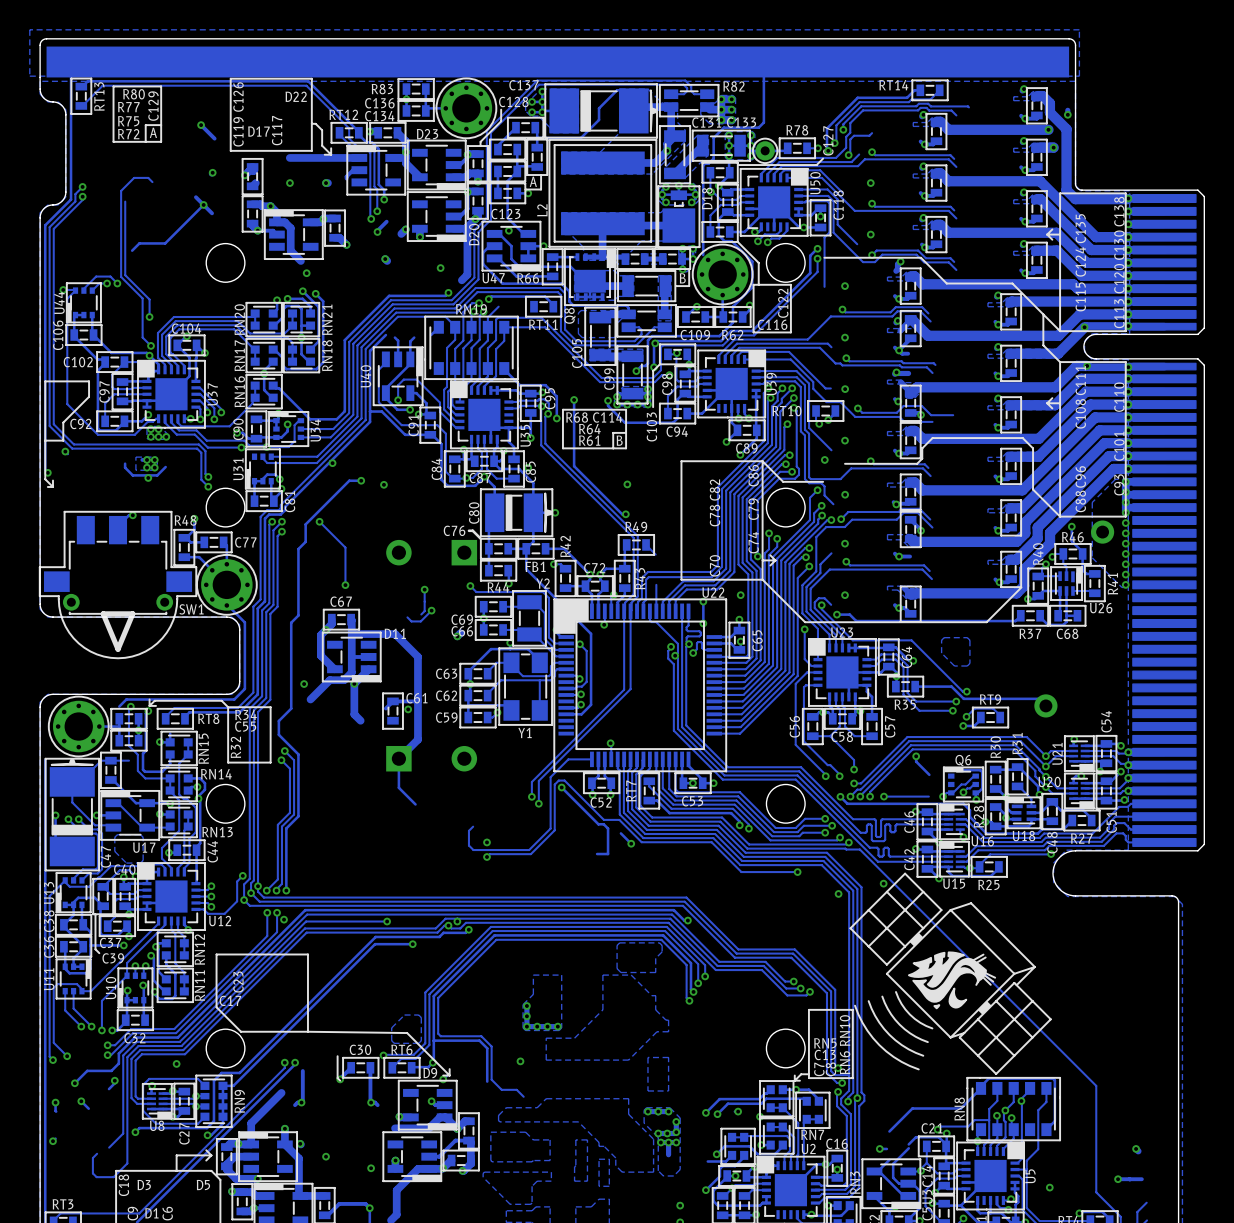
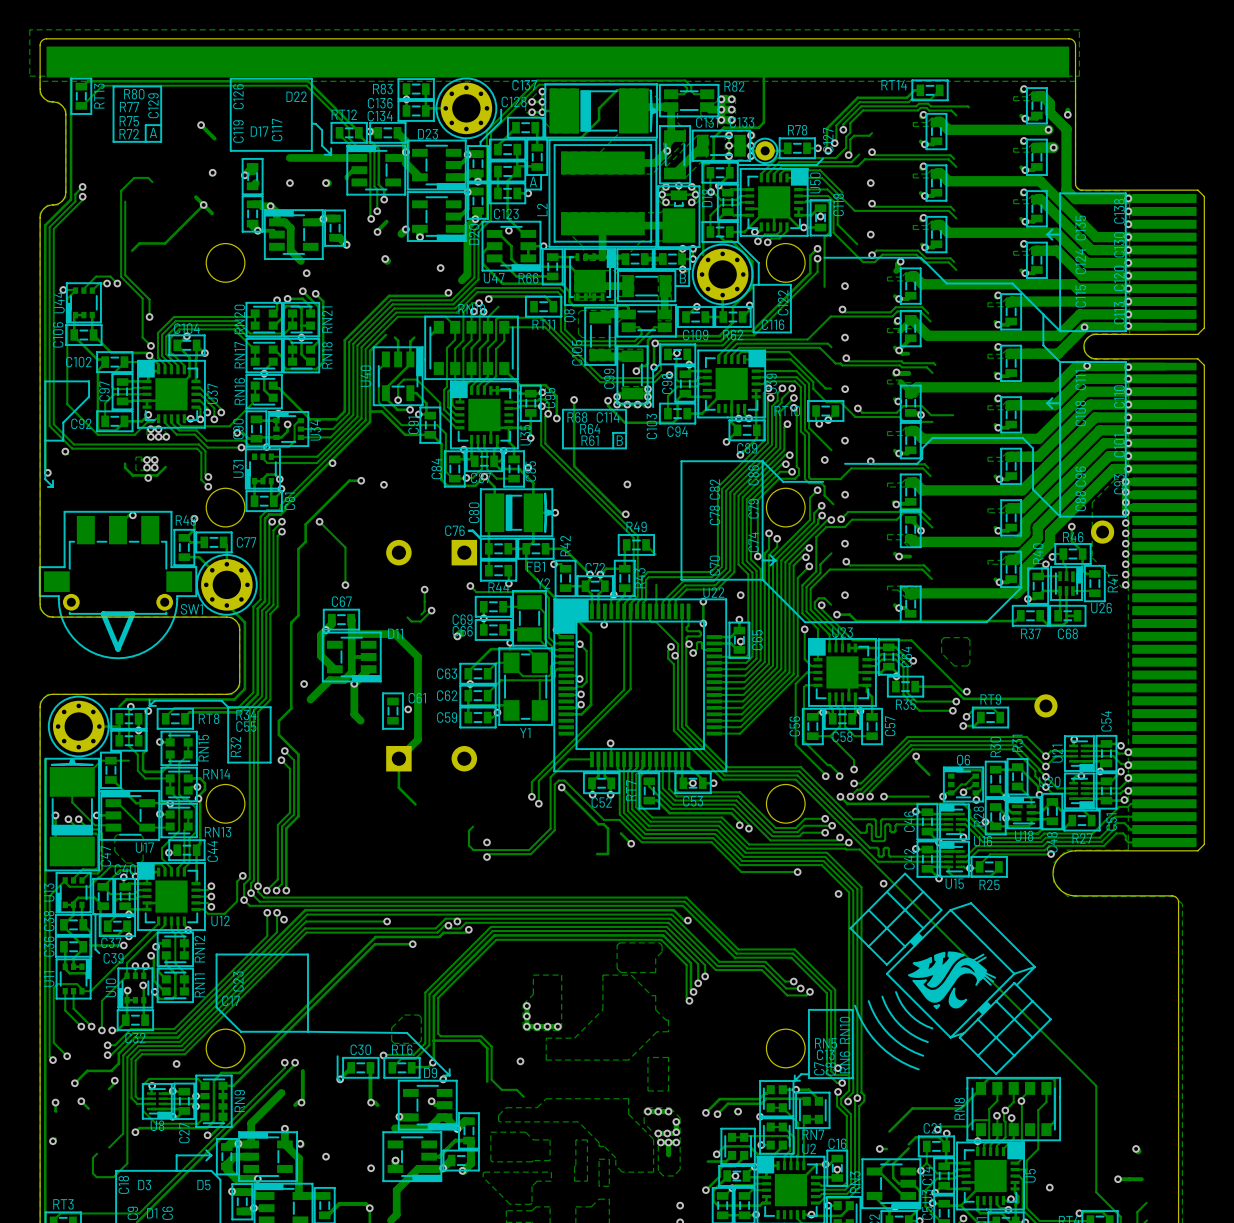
track: (417, 701) (392, 701) (385, 708) -> none

